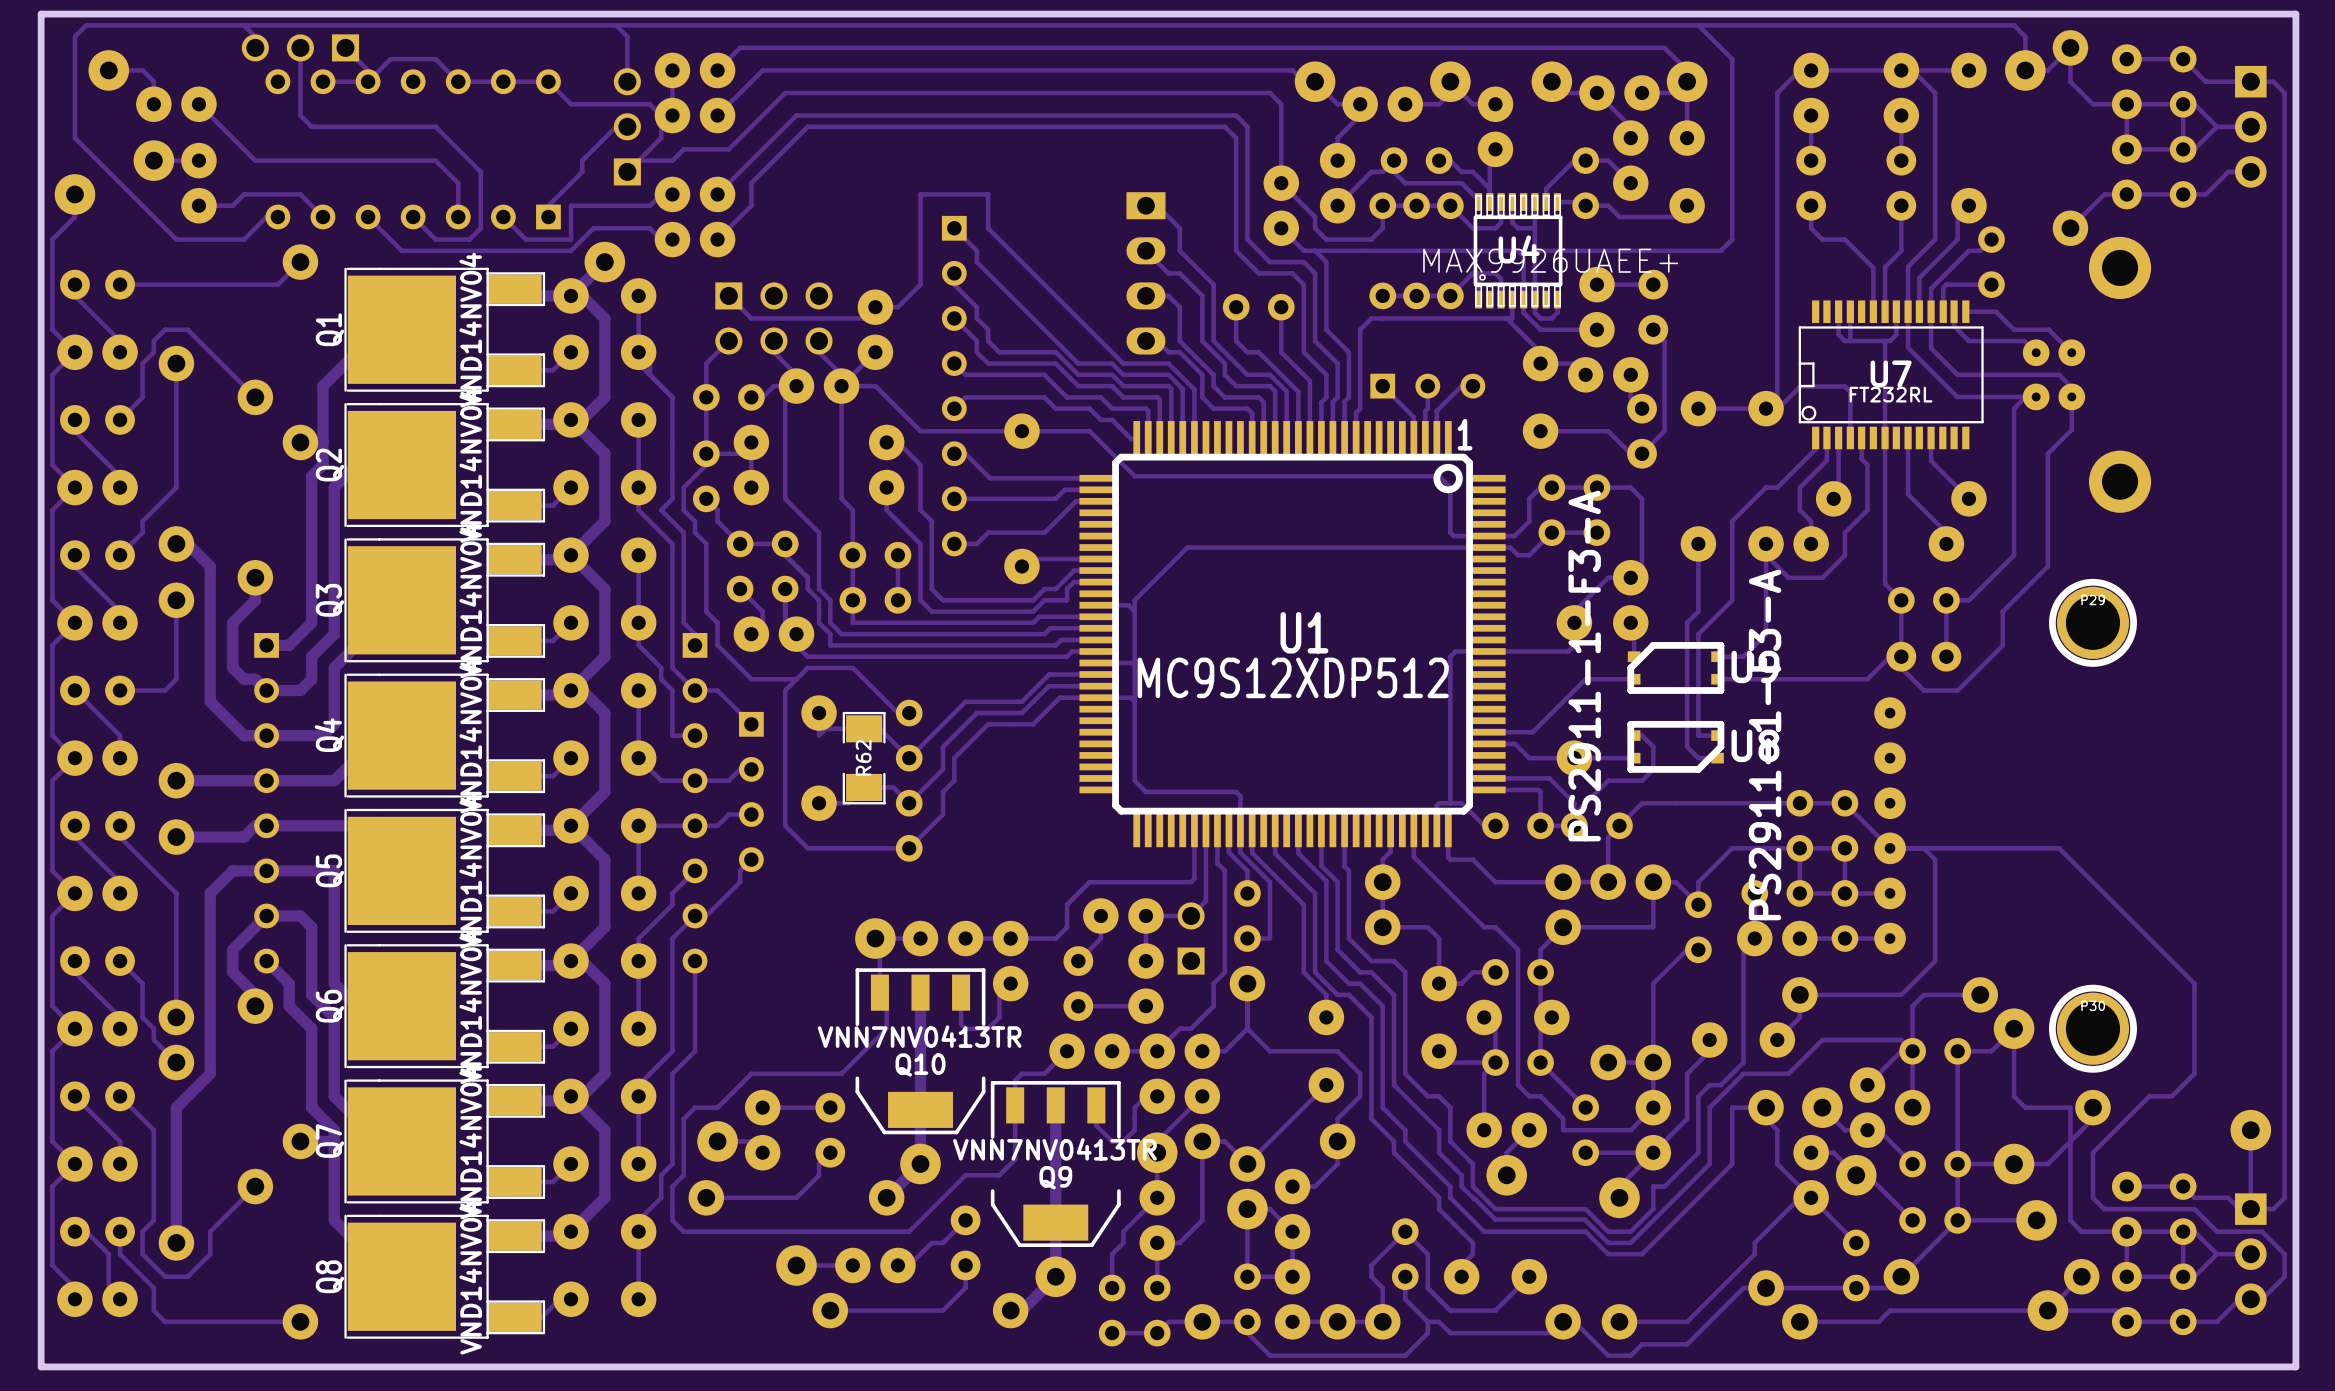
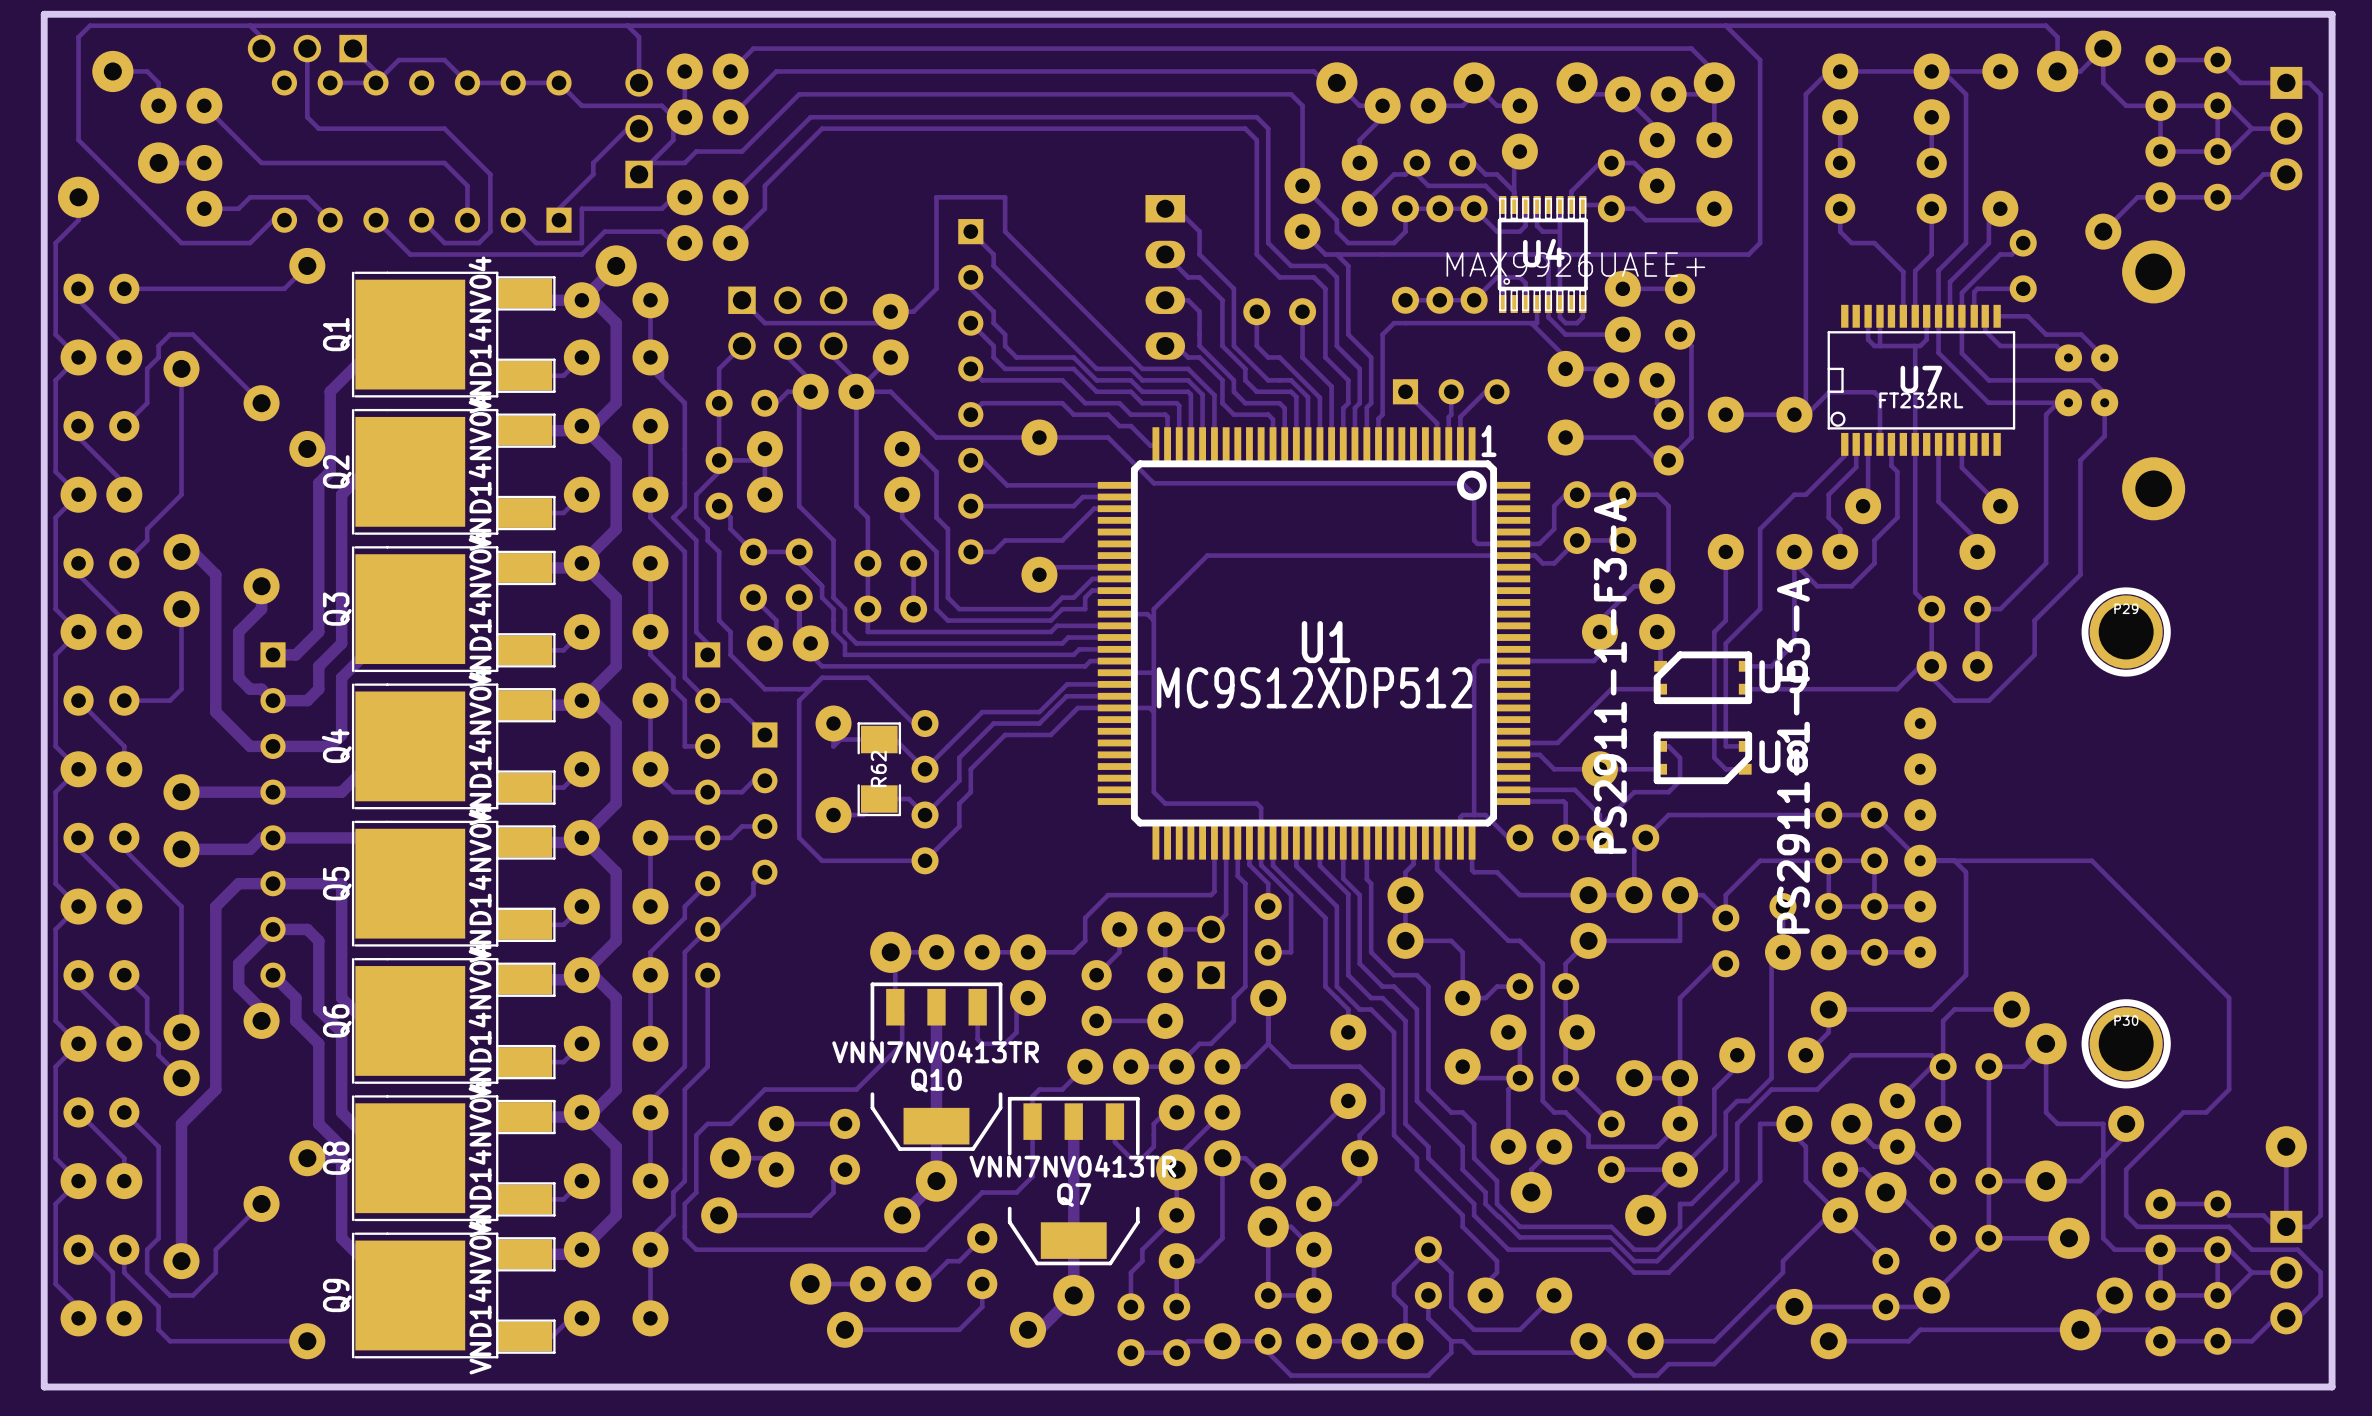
Q7 name: Q7 (329, 1141) -> Q8 (337, 1158)
Q9 name: Q9 (1055, 1177) -> Q7 (1074, 1195)
Q8 name: Q8 (329, 1276) -> Q9 (337, 1295)

